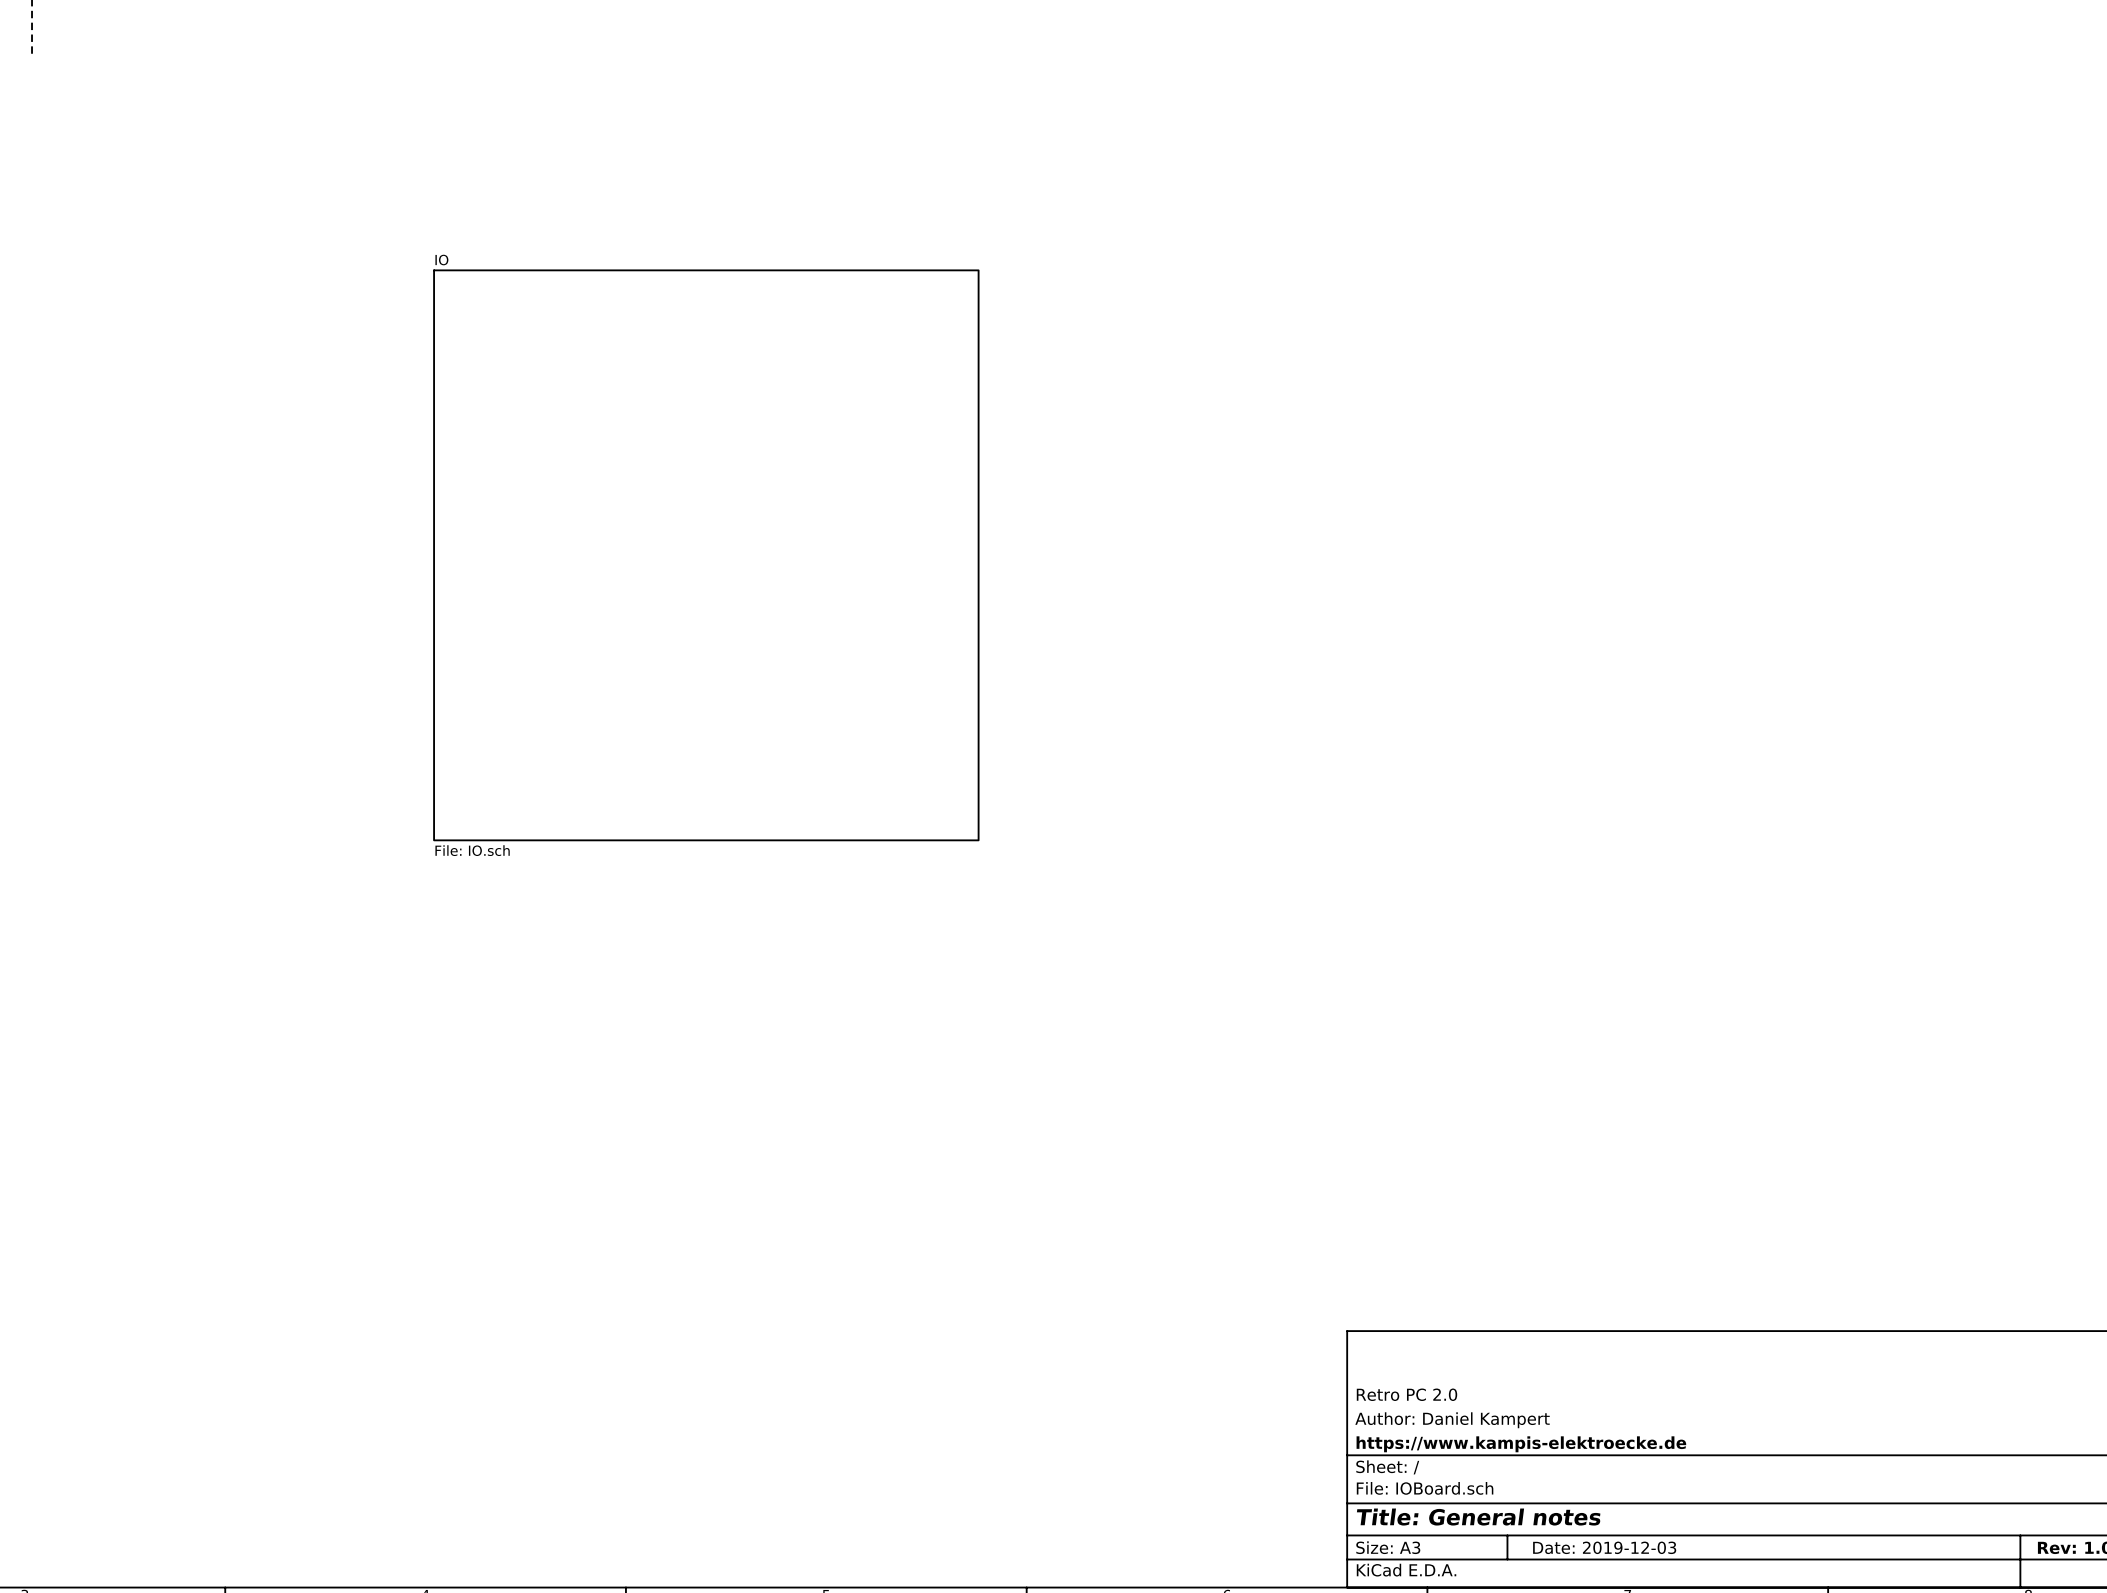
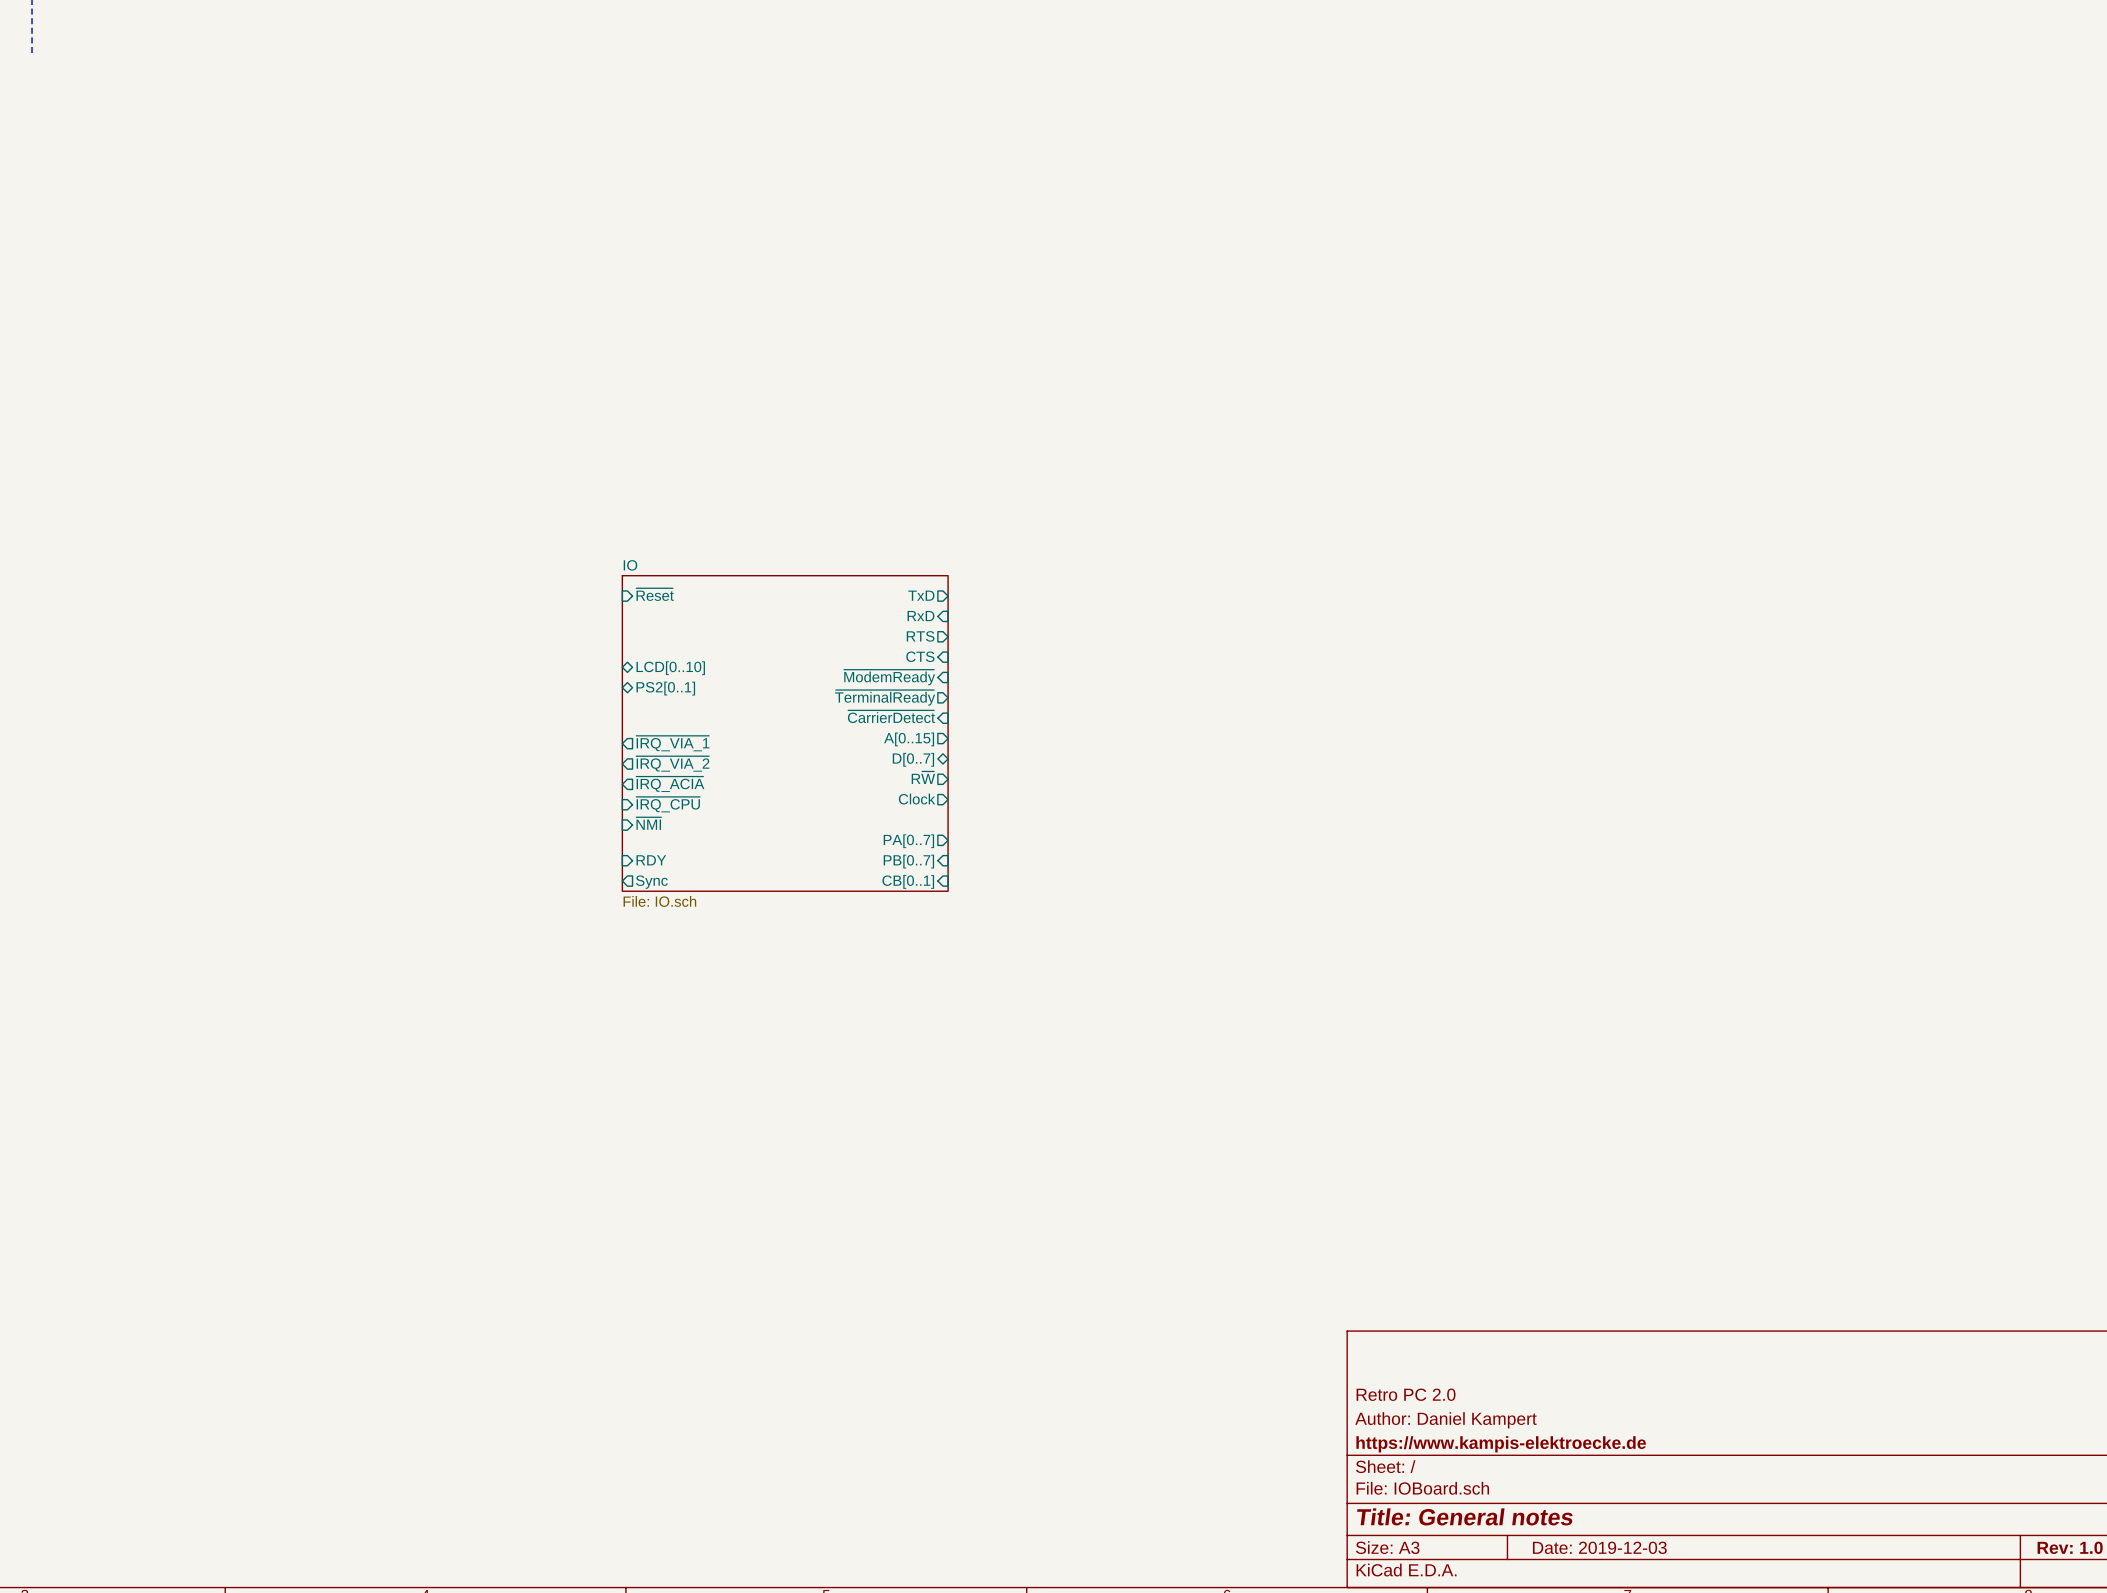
sheet IO: File: IO.sch (706, 555) -> none
sheet pin: none -> ~{Reset} (655, 594)
sheet pin: none -> TxD (921, 595)
sheet pin: none -> RxD (921, 616)
sheet pin: none -> RTS (920, 636)
sheet pin: none -> CTS (920, 656)
sheet pin: none -> LCD[0..10] (670, 668)
sheet pin: none -> ~{ModemReady} (889, 677)
sheet pin: none -> PS2[0..1] (665, 688)
sheet pin: none -> ~{TerminalReady} (885, 697)
sheet pin: none -> ~{CarrierDetect} (891, 716)
sheet IO: none -> File: IO.sch (785, 733)
sheet pin: none -> A[0..15] (909, 739)
sheet pin: none -> ~{IRQ_VIA_1} (672, 743)
sheet pin: none -> D[0..7] (913, 759)
sheet pin: none -> ~{IRQ_VIA_2} (672, 763)
sheet pin: none -> R~{W} (923, 777)
sheet pin: none -> ~{IRQ_ACIA} (670, 784)
sheet pin: none -> Clock (917, 799)
sheet pin: none -> ~{IRQ_CPU} (668, 804)
sheet pin: none -> ~{NMI} (648, 823)
sheet pin: none -> PA[0..7] (908, 841)
sheet pin: none -> RDY (651, 860)
sheet pin: none -> PB[0..7] (908, 861)
sheet pin: none -> CB[0..1] (908, 881)
sheet pin: none -> Sync (651, 882)

